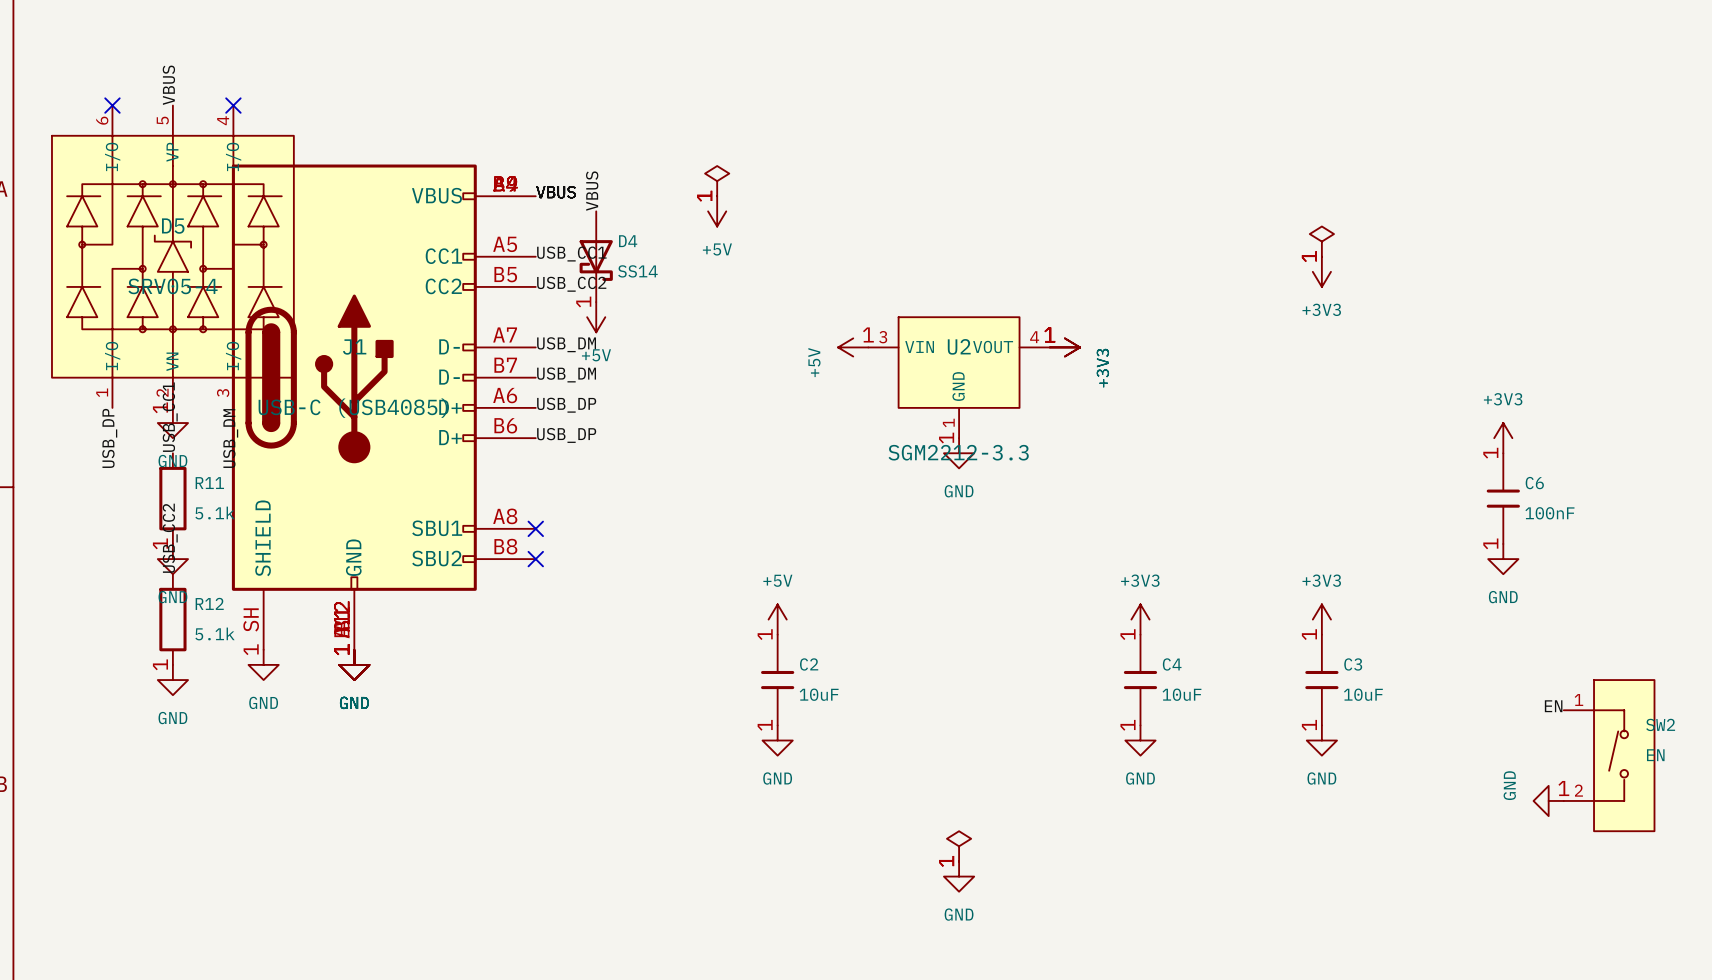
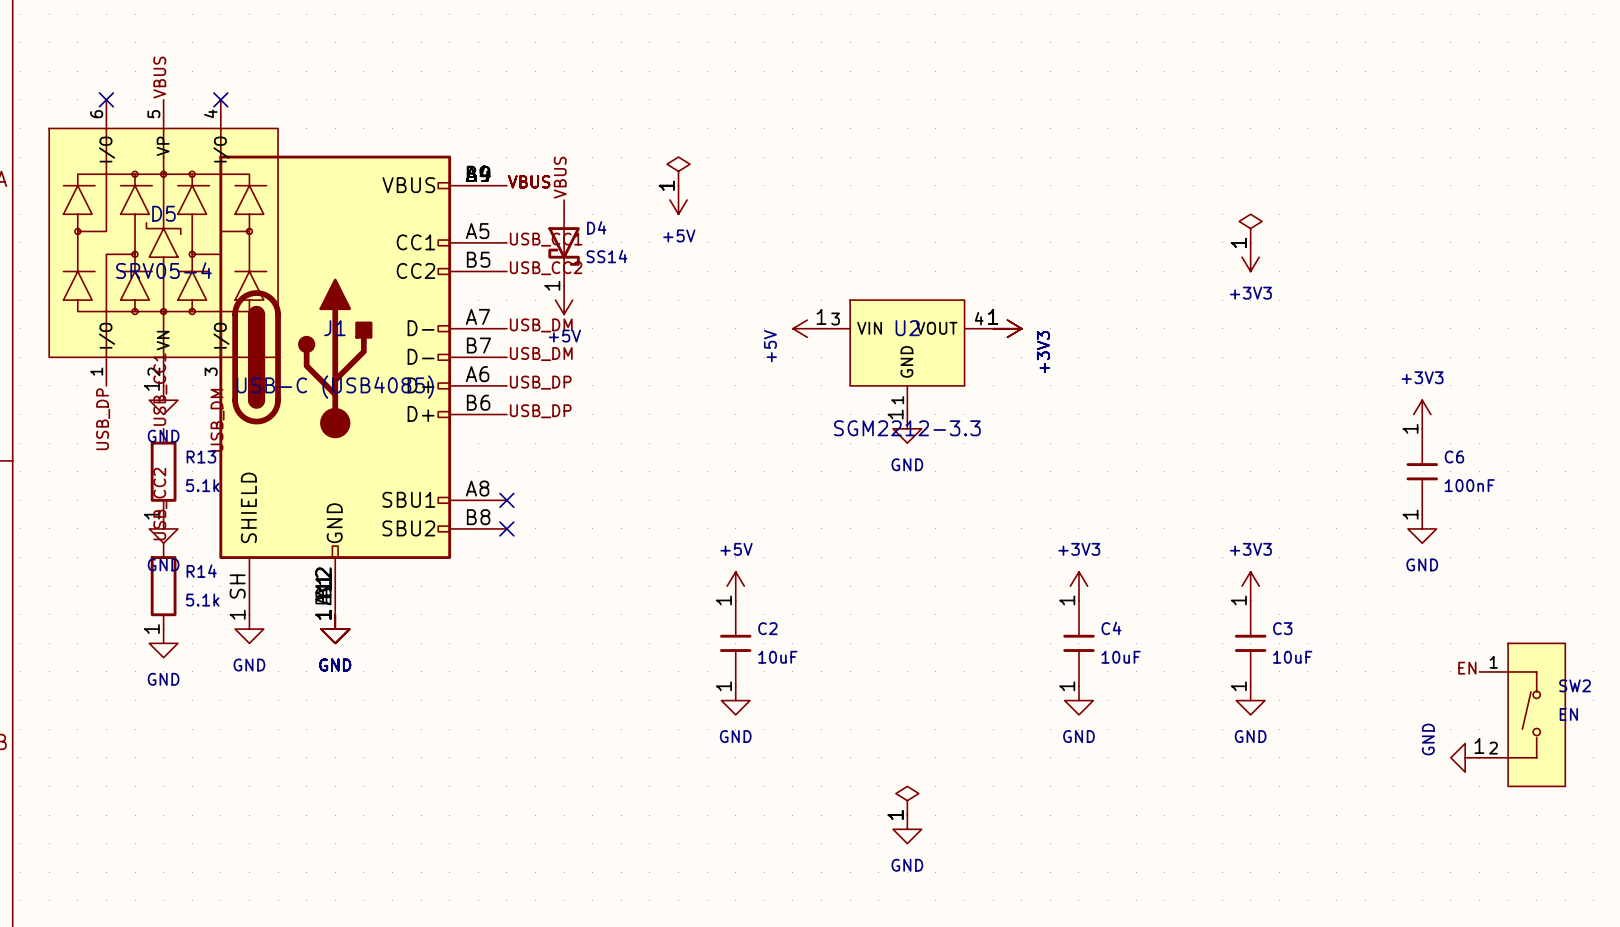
R11 name: R11 (209, 483) -> R13 (201, 457)
R12 name: R12 (209, 603) -> R14 (201, 571)

